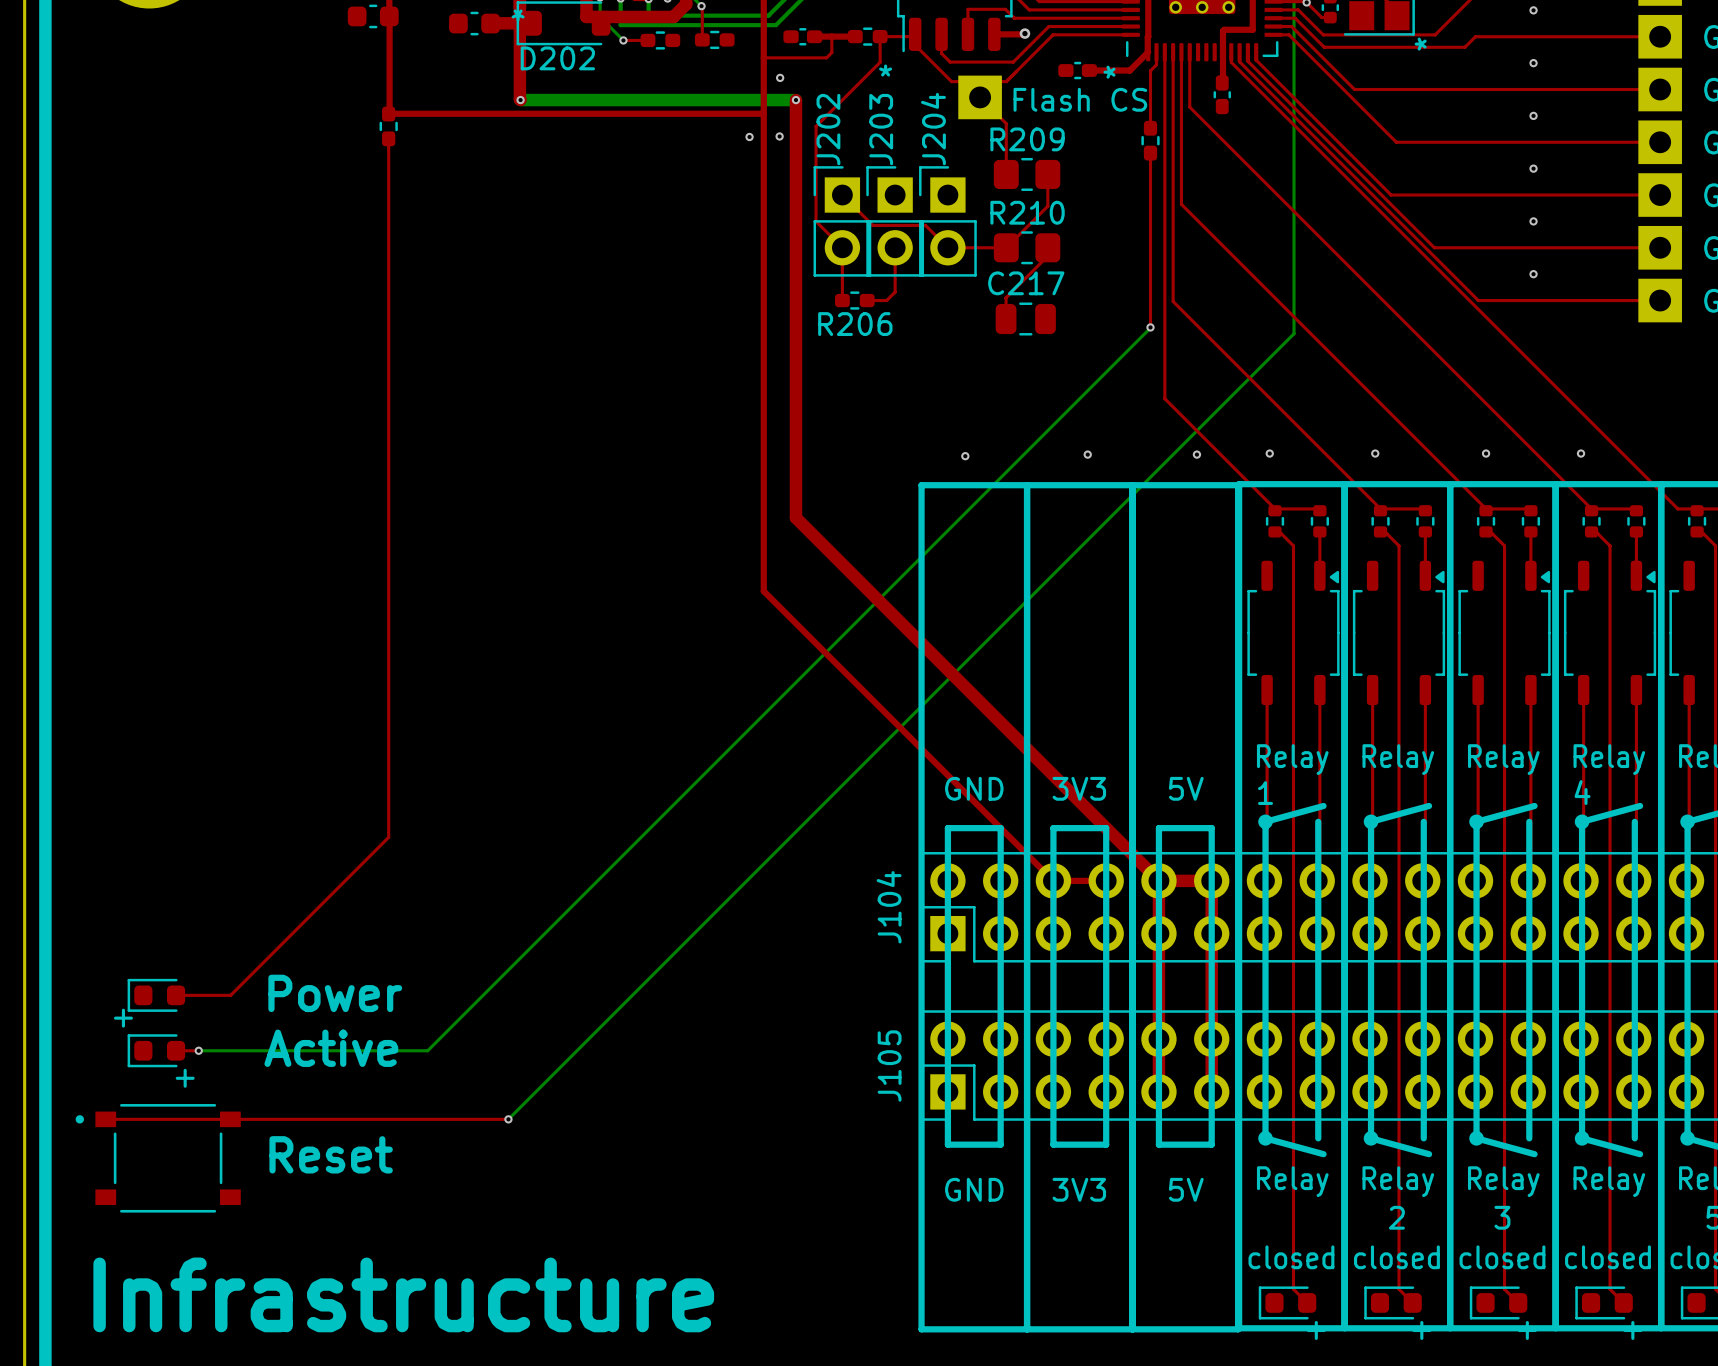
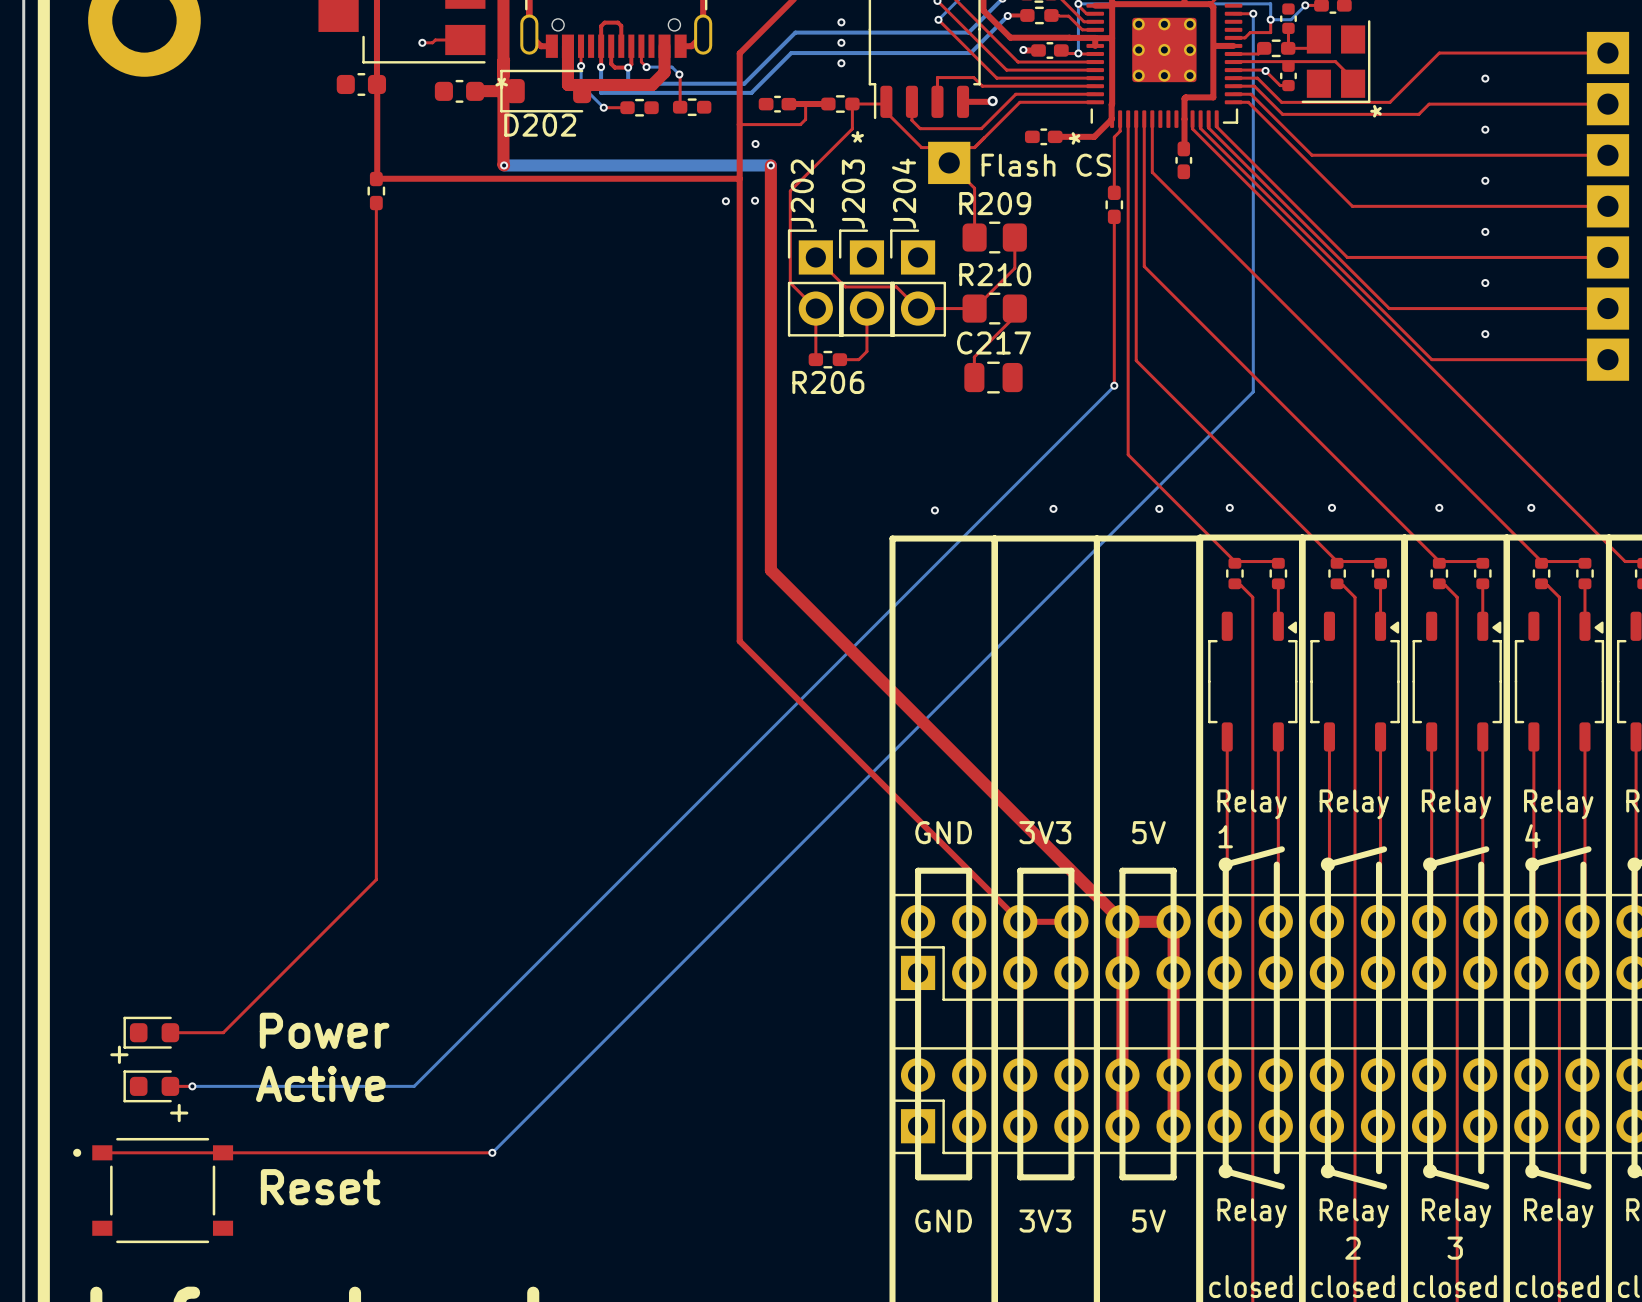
J104 name: J104 (889, 907) -> none
J105 name: J105 (889, 1066) -> none

